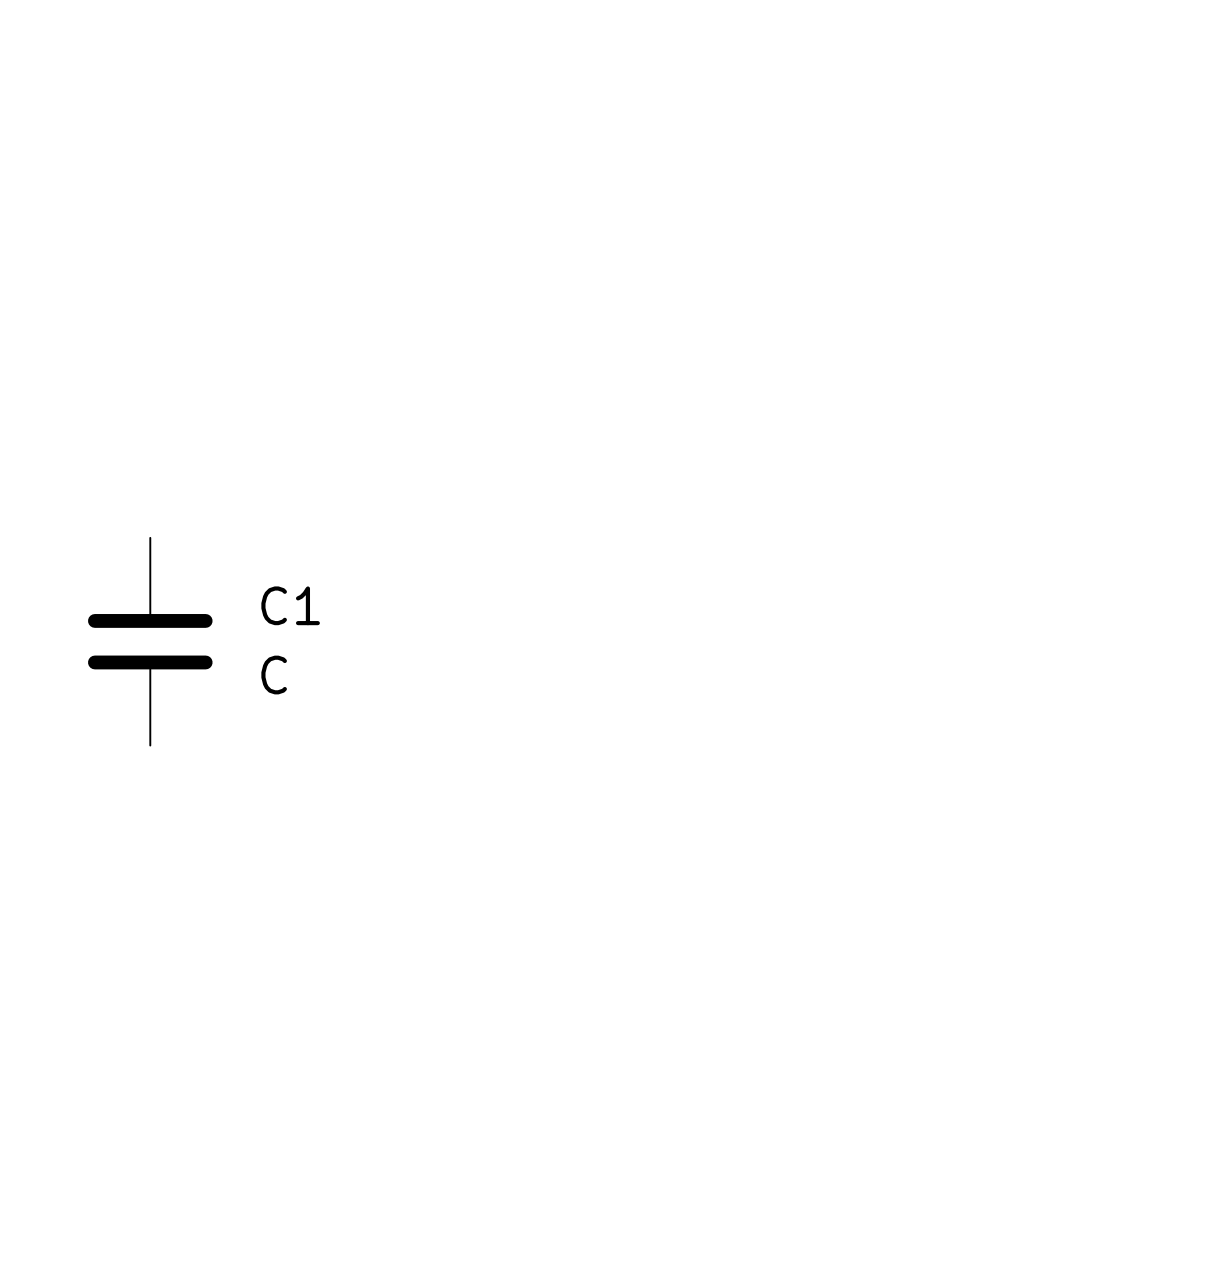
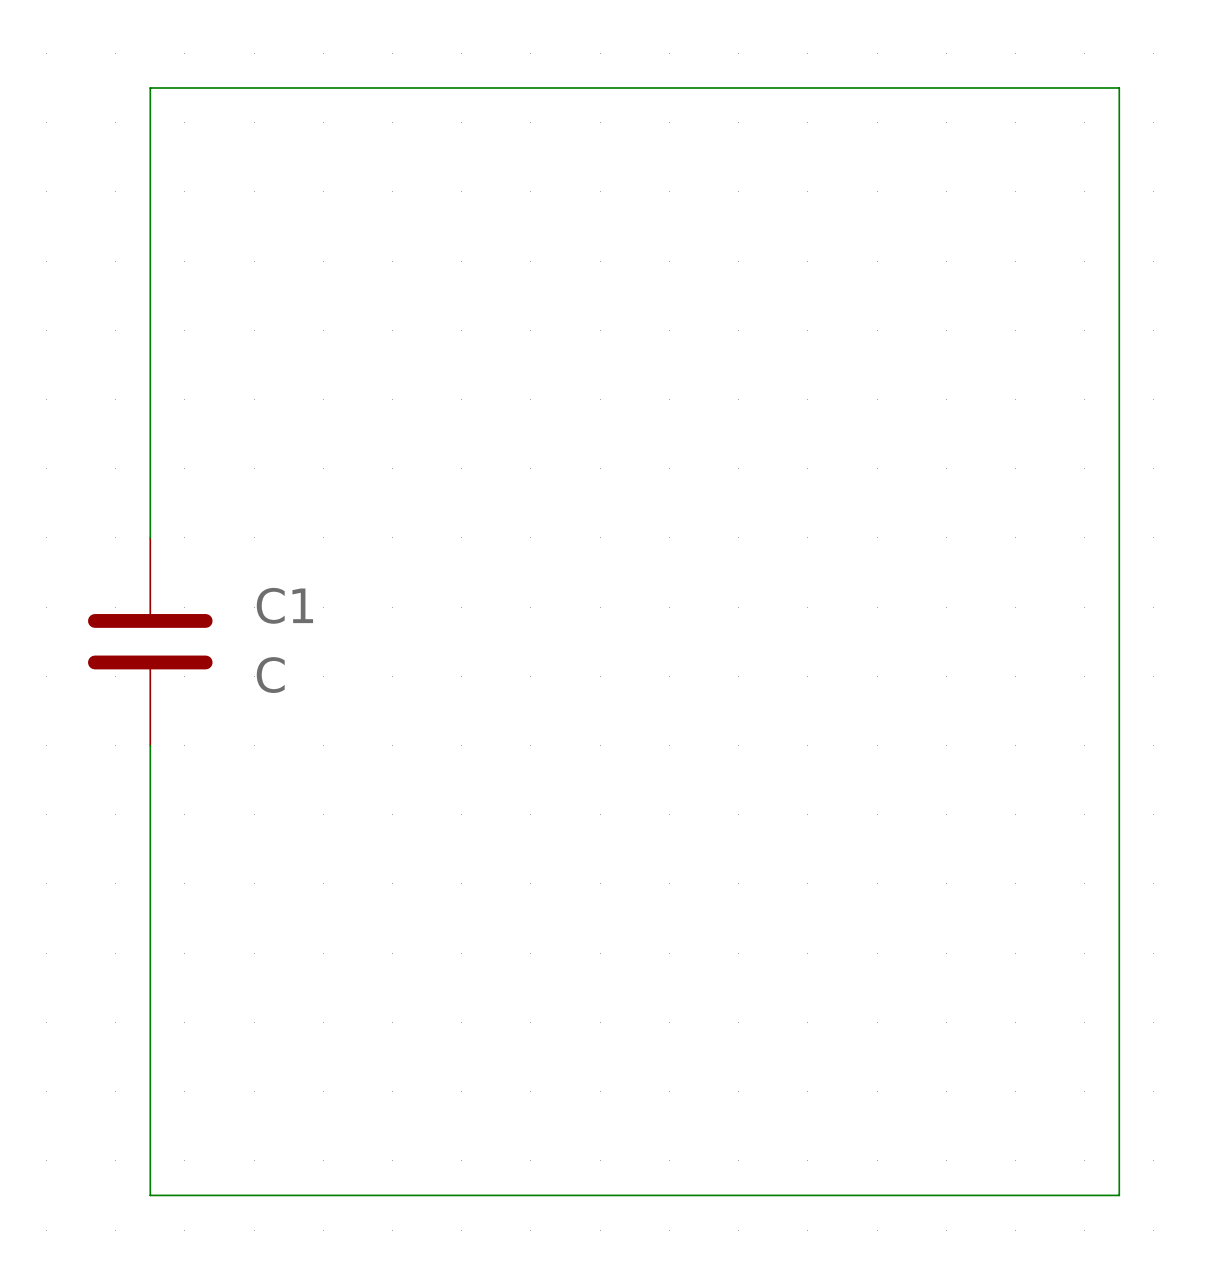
wire: none -> (150, 537) (150, 88) (1119, 88) (1119, 1195) (150, 1195) (150, 745)

